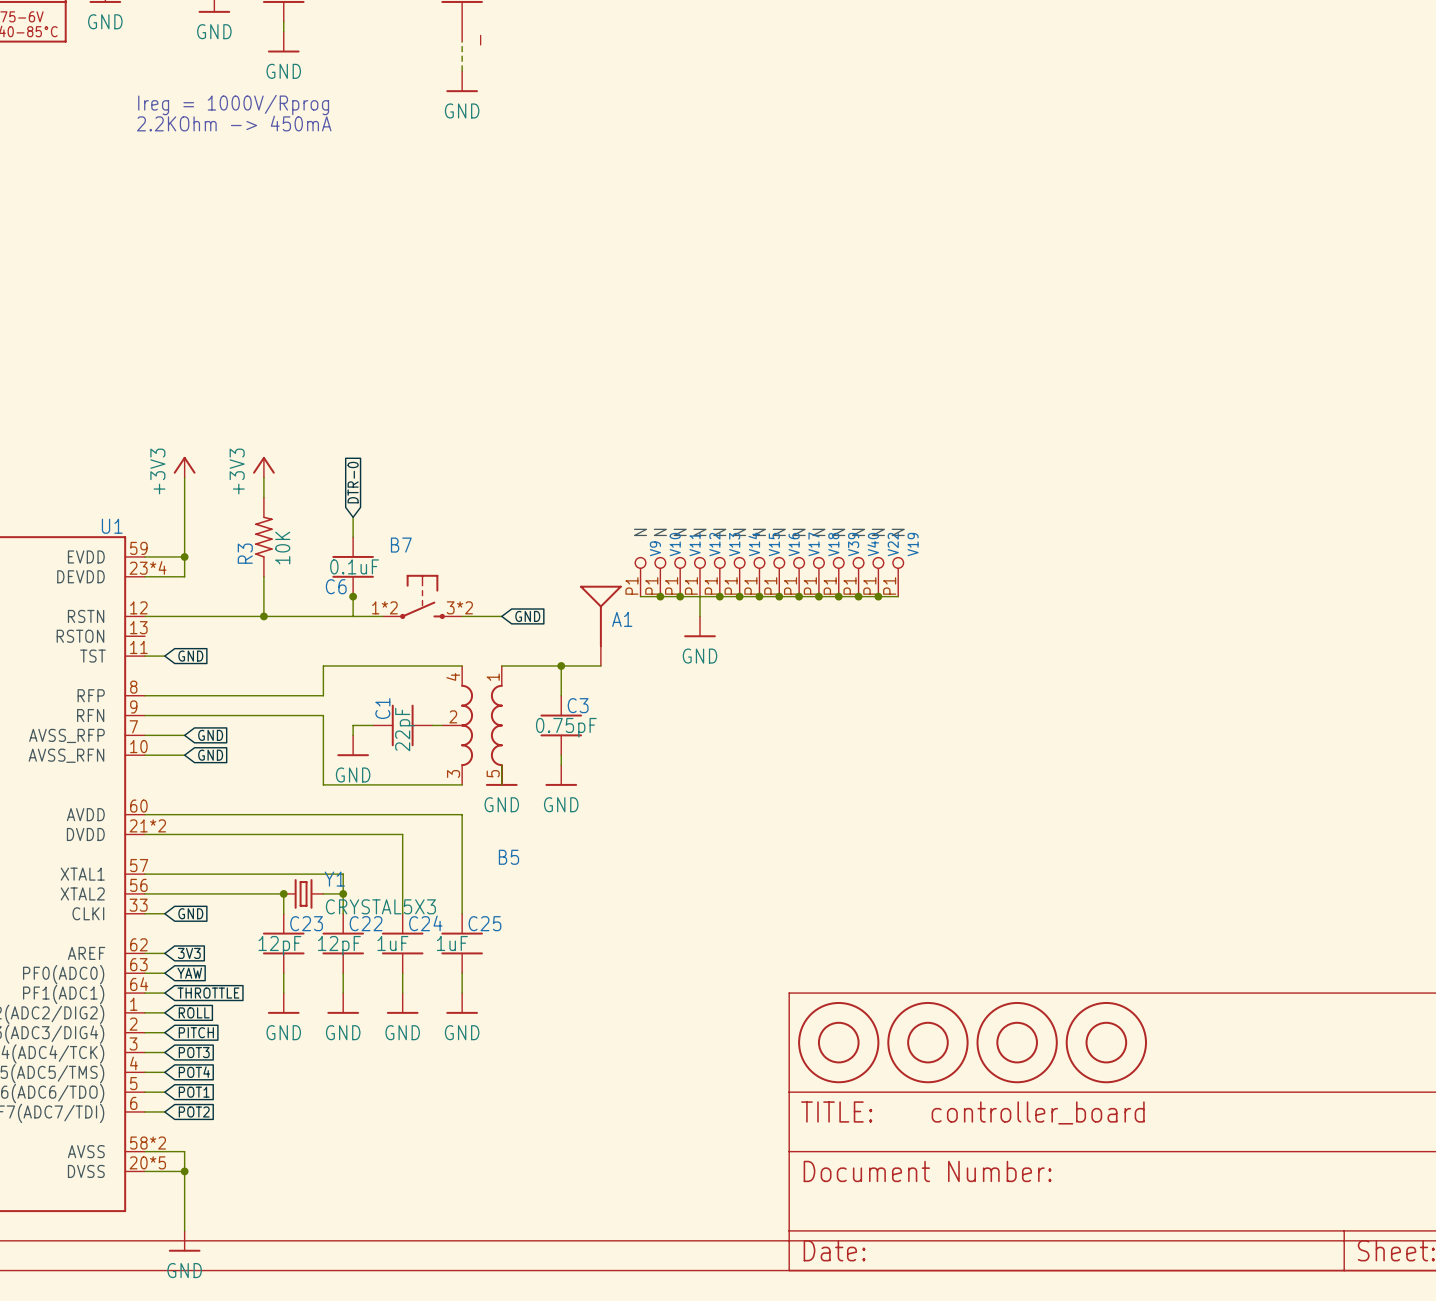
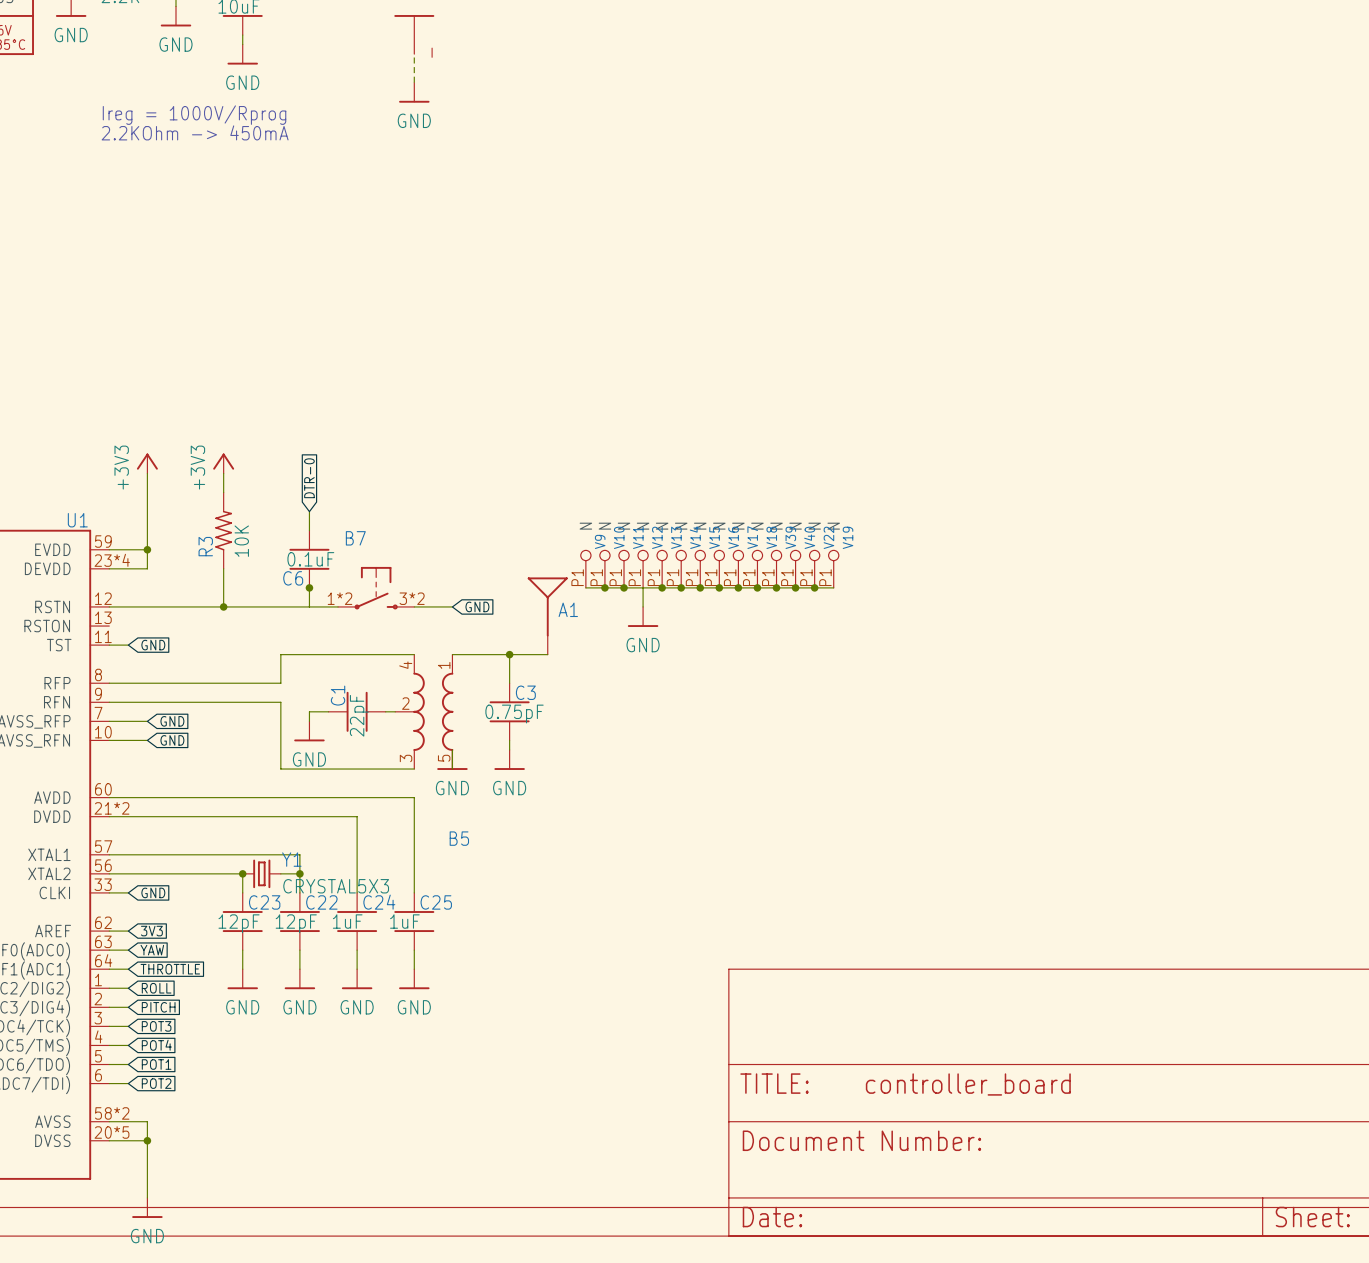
part: (838, 1042) -> none
part: (927, 1042) -> none
part: (1017, 1042) -> none
part: (1106, 1042) -> none

